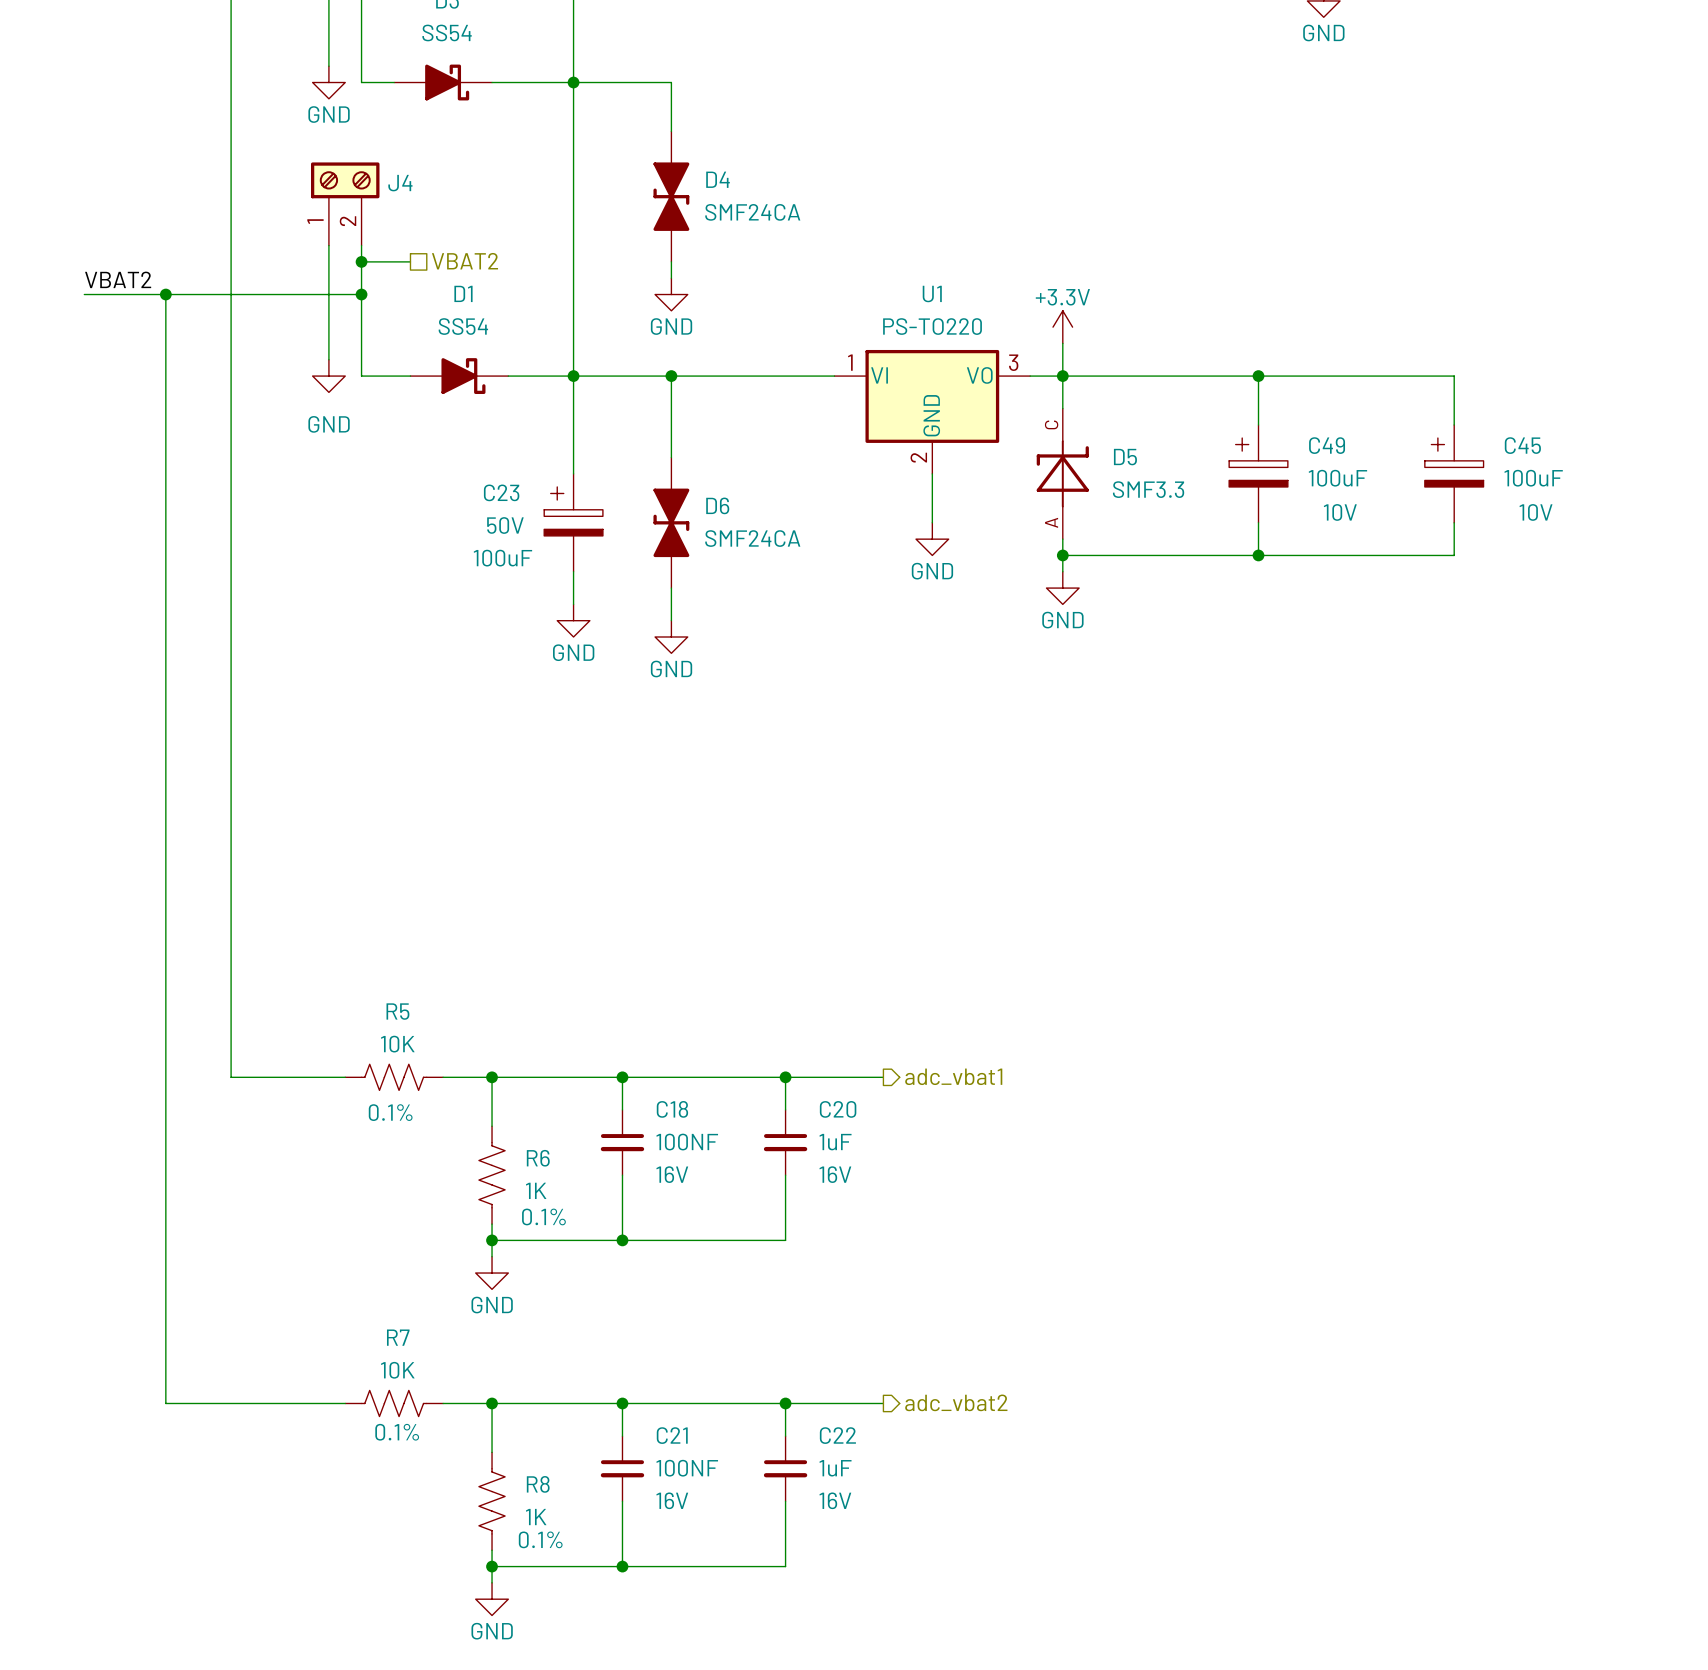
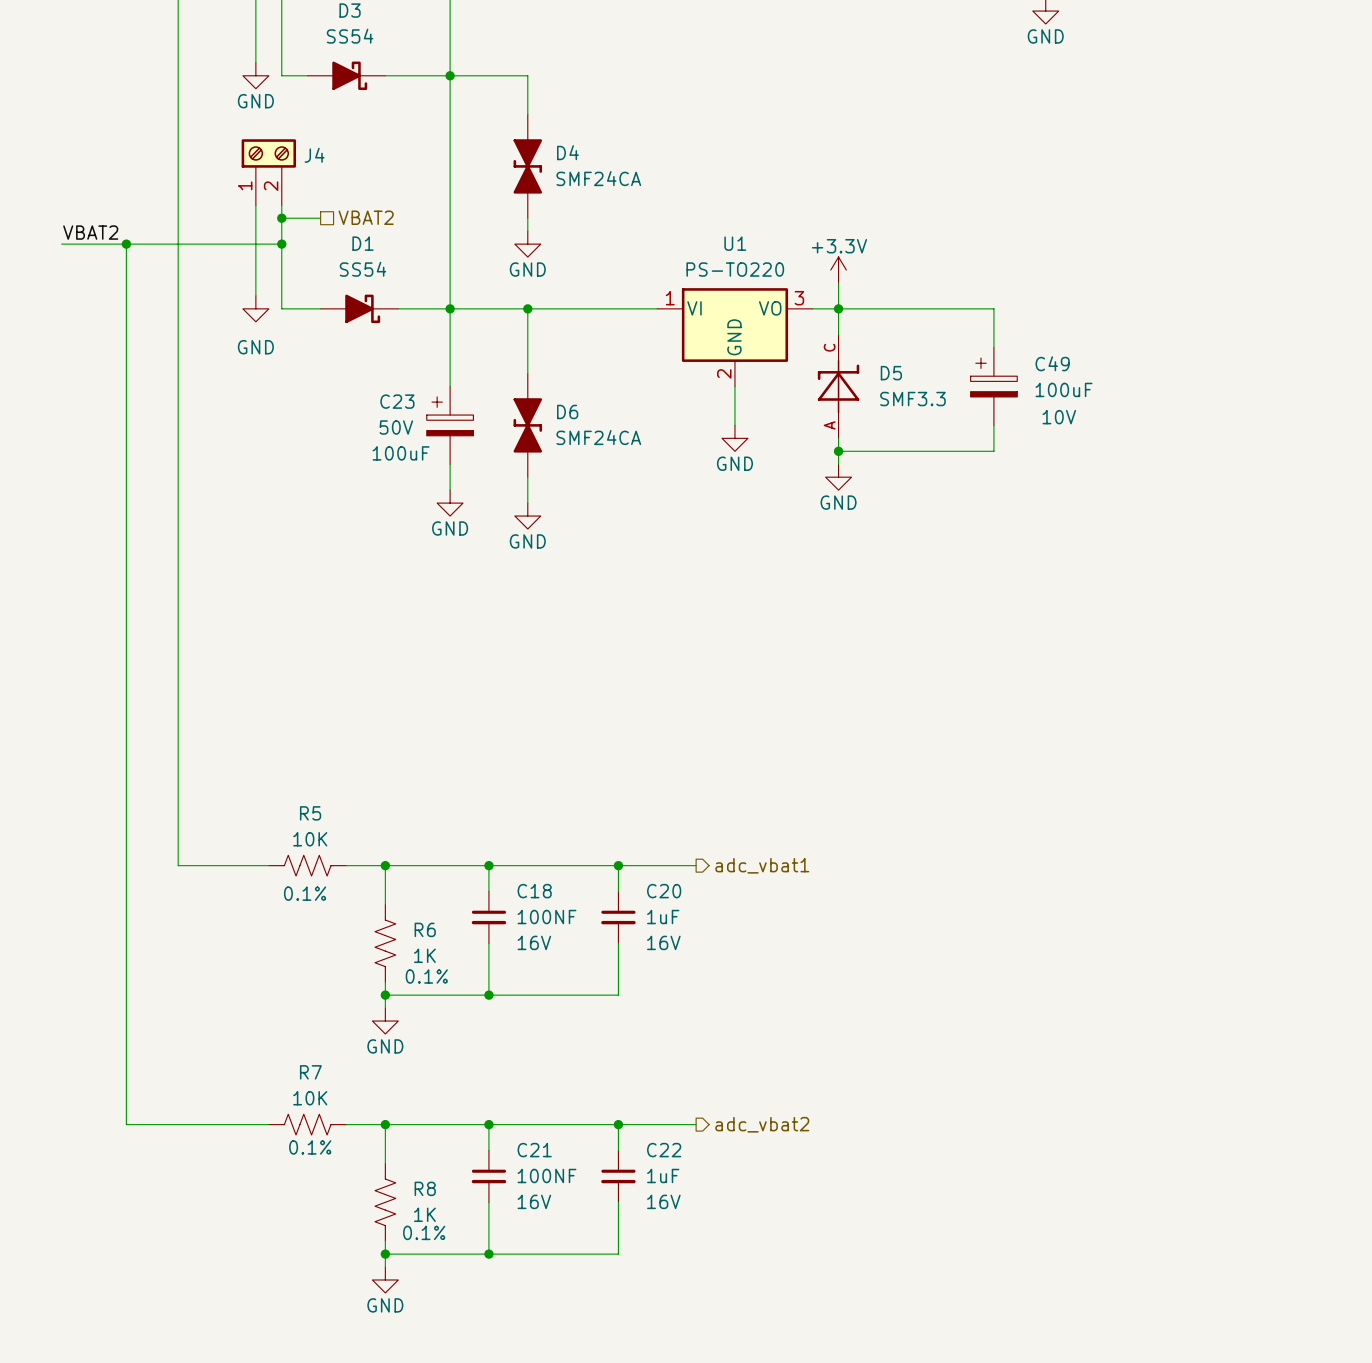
wire: (1258, 376) (1454, 376) (1454, 424) -> none
junction: (1258, 376) -> none
C45: 100uF (1454, 473) -> none
wire: (1454, 522) (1454, 555) (1258, 555) -> none
junction: (1258, 555) -> none

